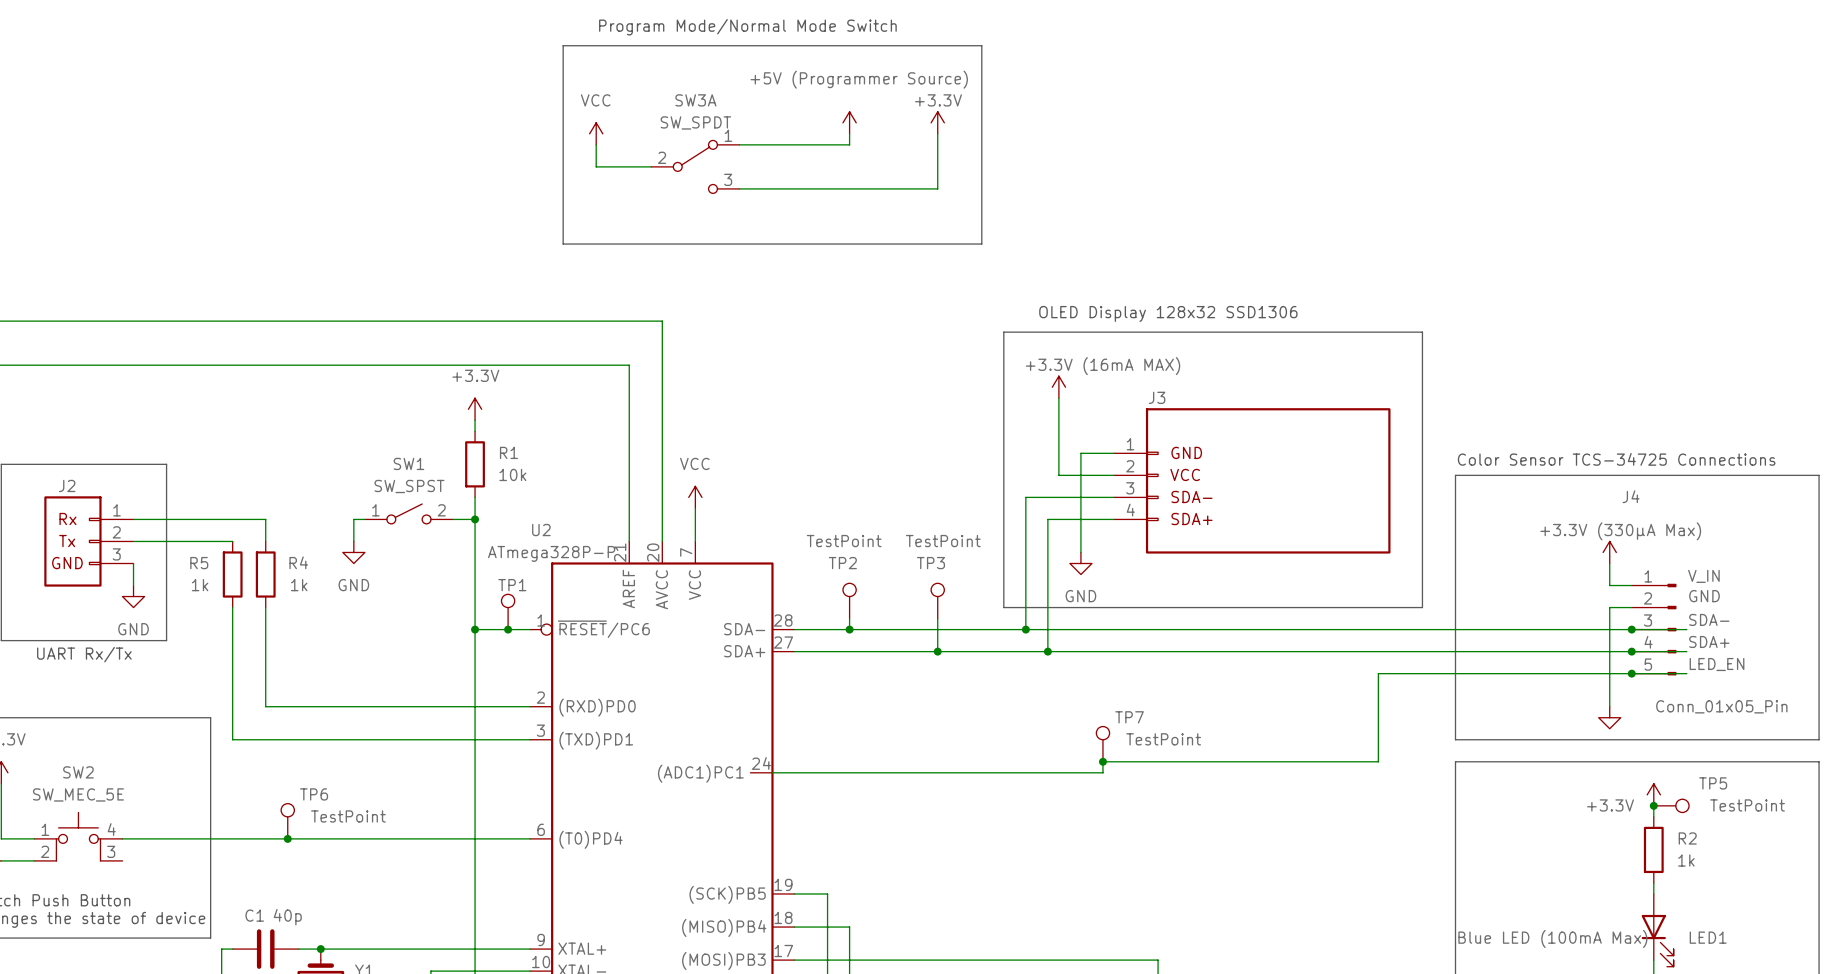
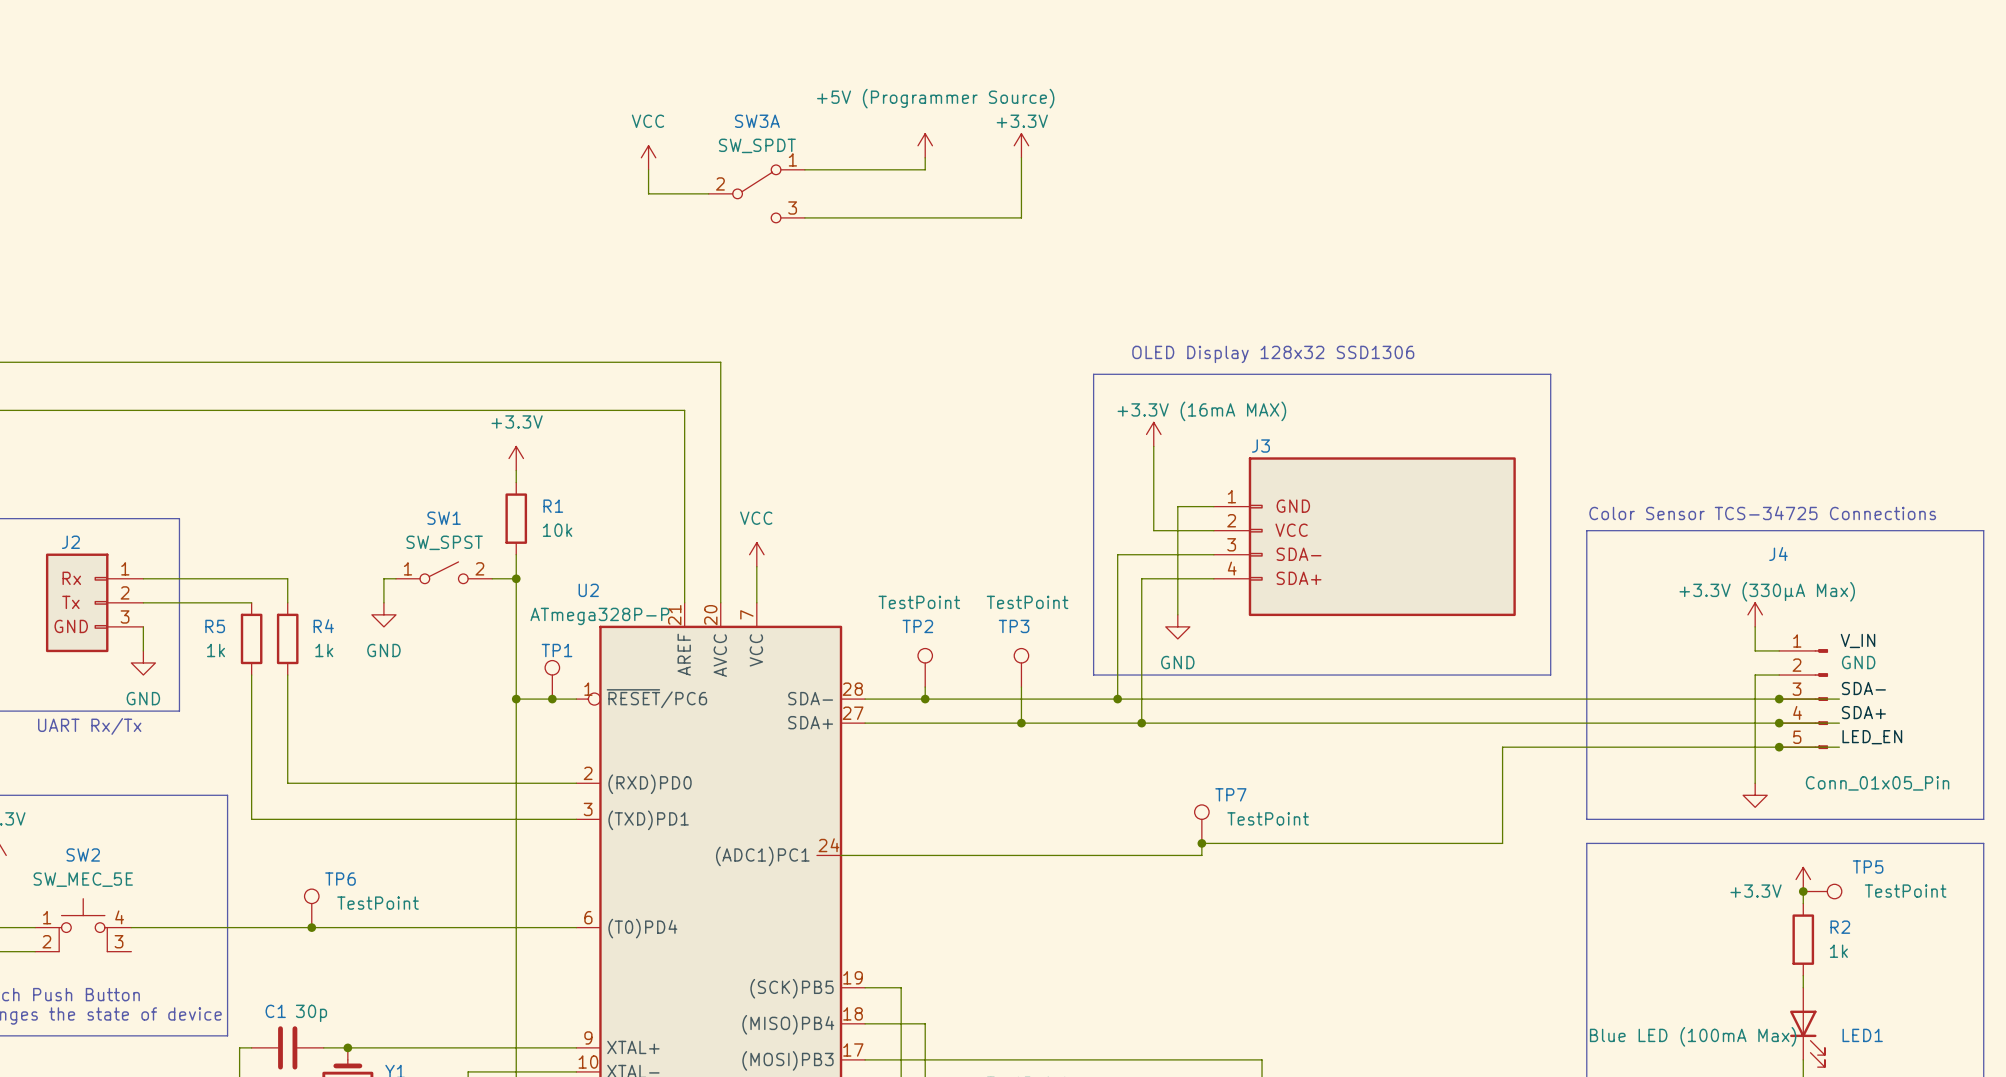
text: Program Mode/Normal Mode Switch (747, 27) -> none
line: (563, 45) (981, 45) (981, 244) (563, 244) (563, 45) -> none
C1 value: 40p (287, 917) -> 30p (311, 1013)

